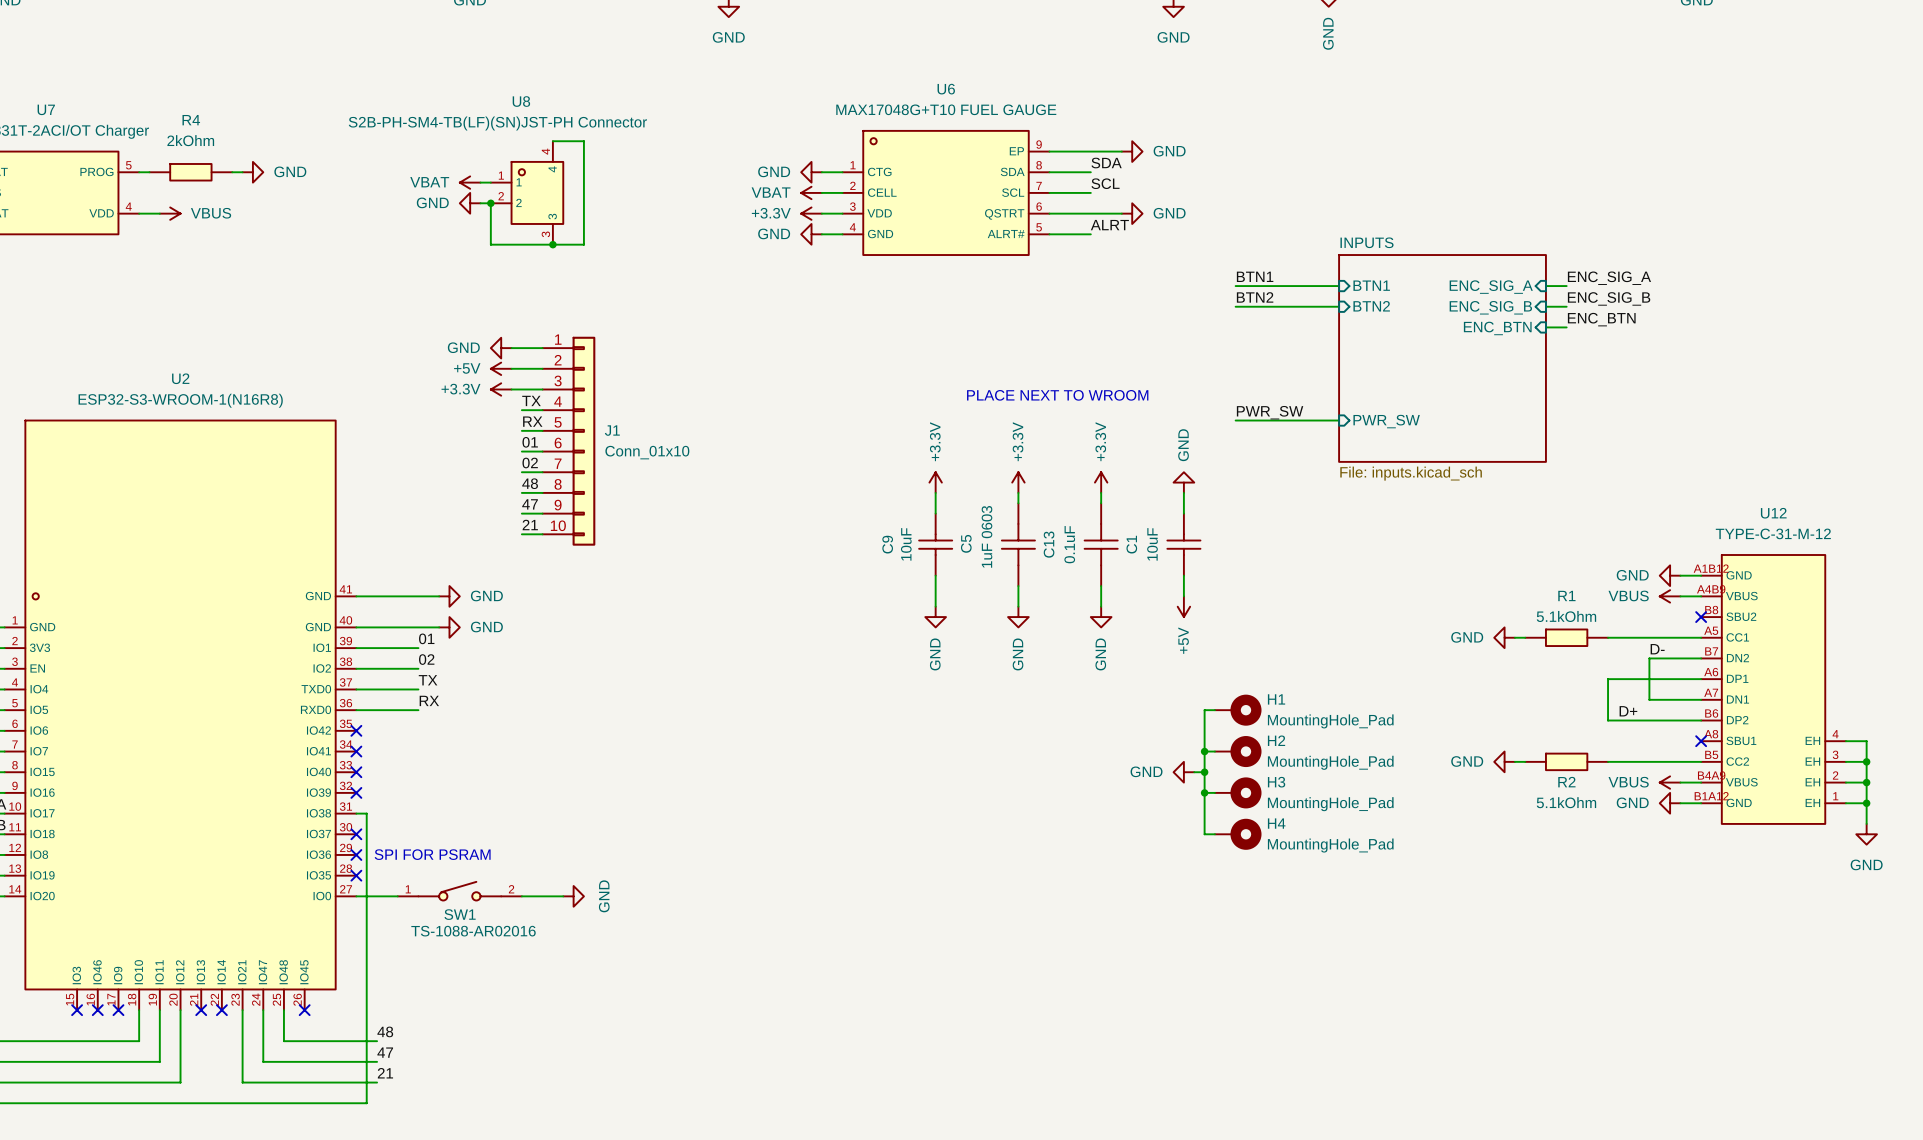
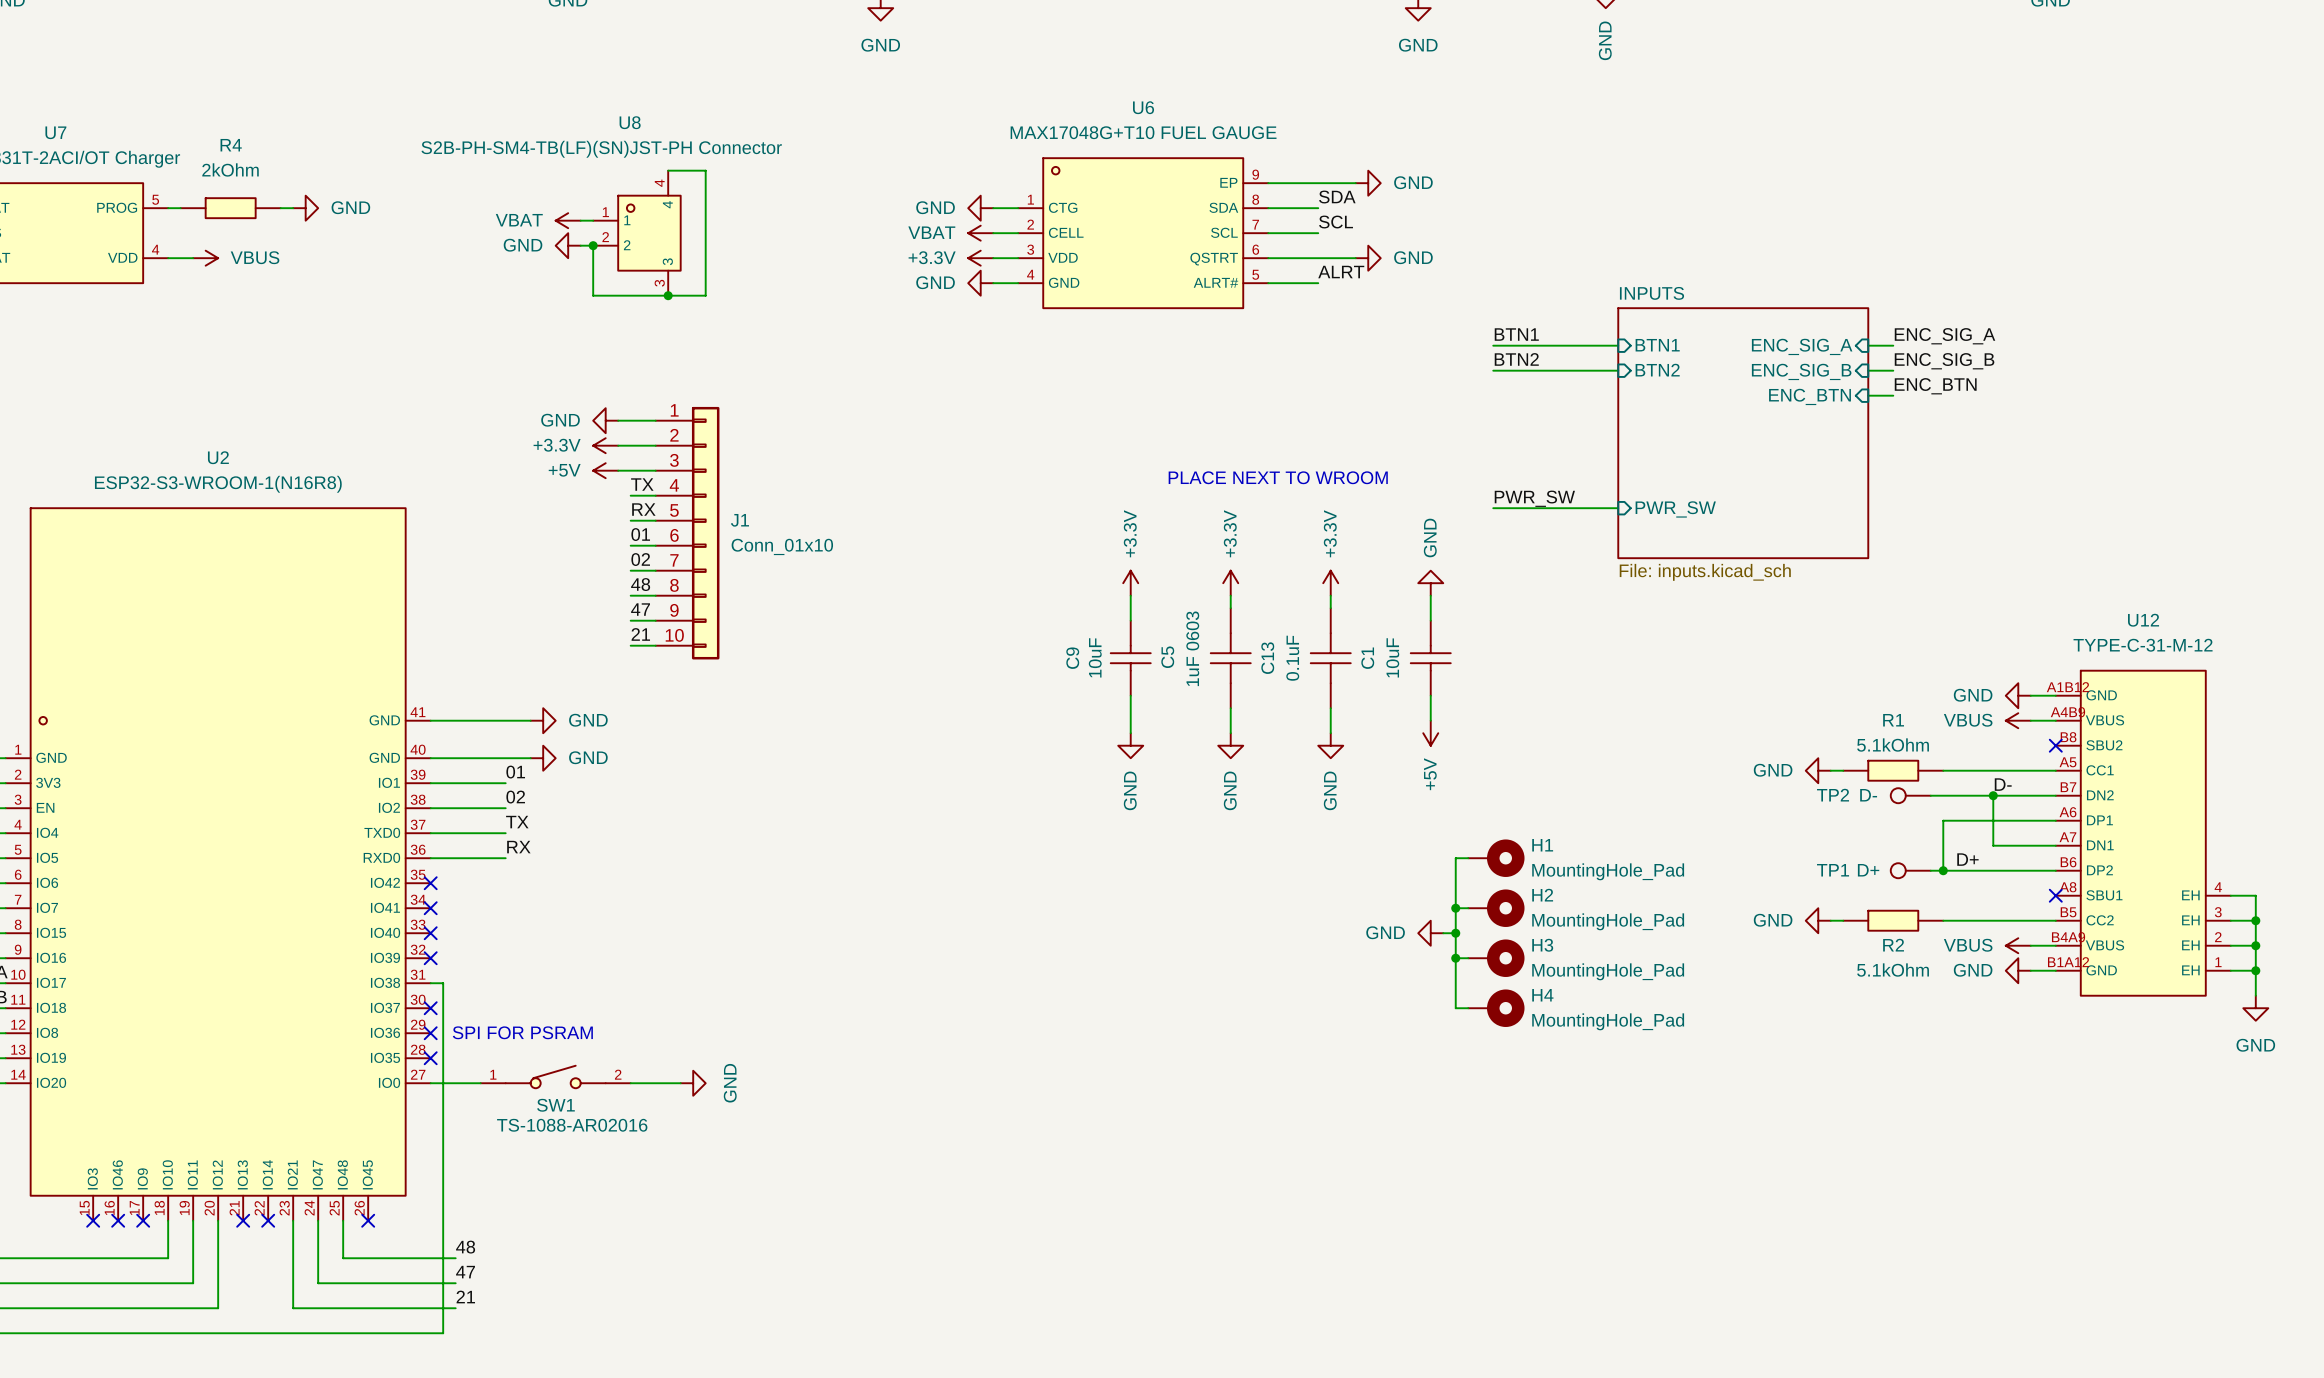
power symbol: +5V (501, 368) -> +3.3V (605, 445)
power symbol: +3.3V (501, 389) -> +5V (605, 470)
TP2: none -> D- (1910, 795)
wire: none -> (1930, 795) (1993, 795)
junction: none -> (1993, 795)
TP1: none -> D+ (1910, 870)
wire: none -> (1930, 870) (1943, 870)
junction: none -> (1943, 870)

